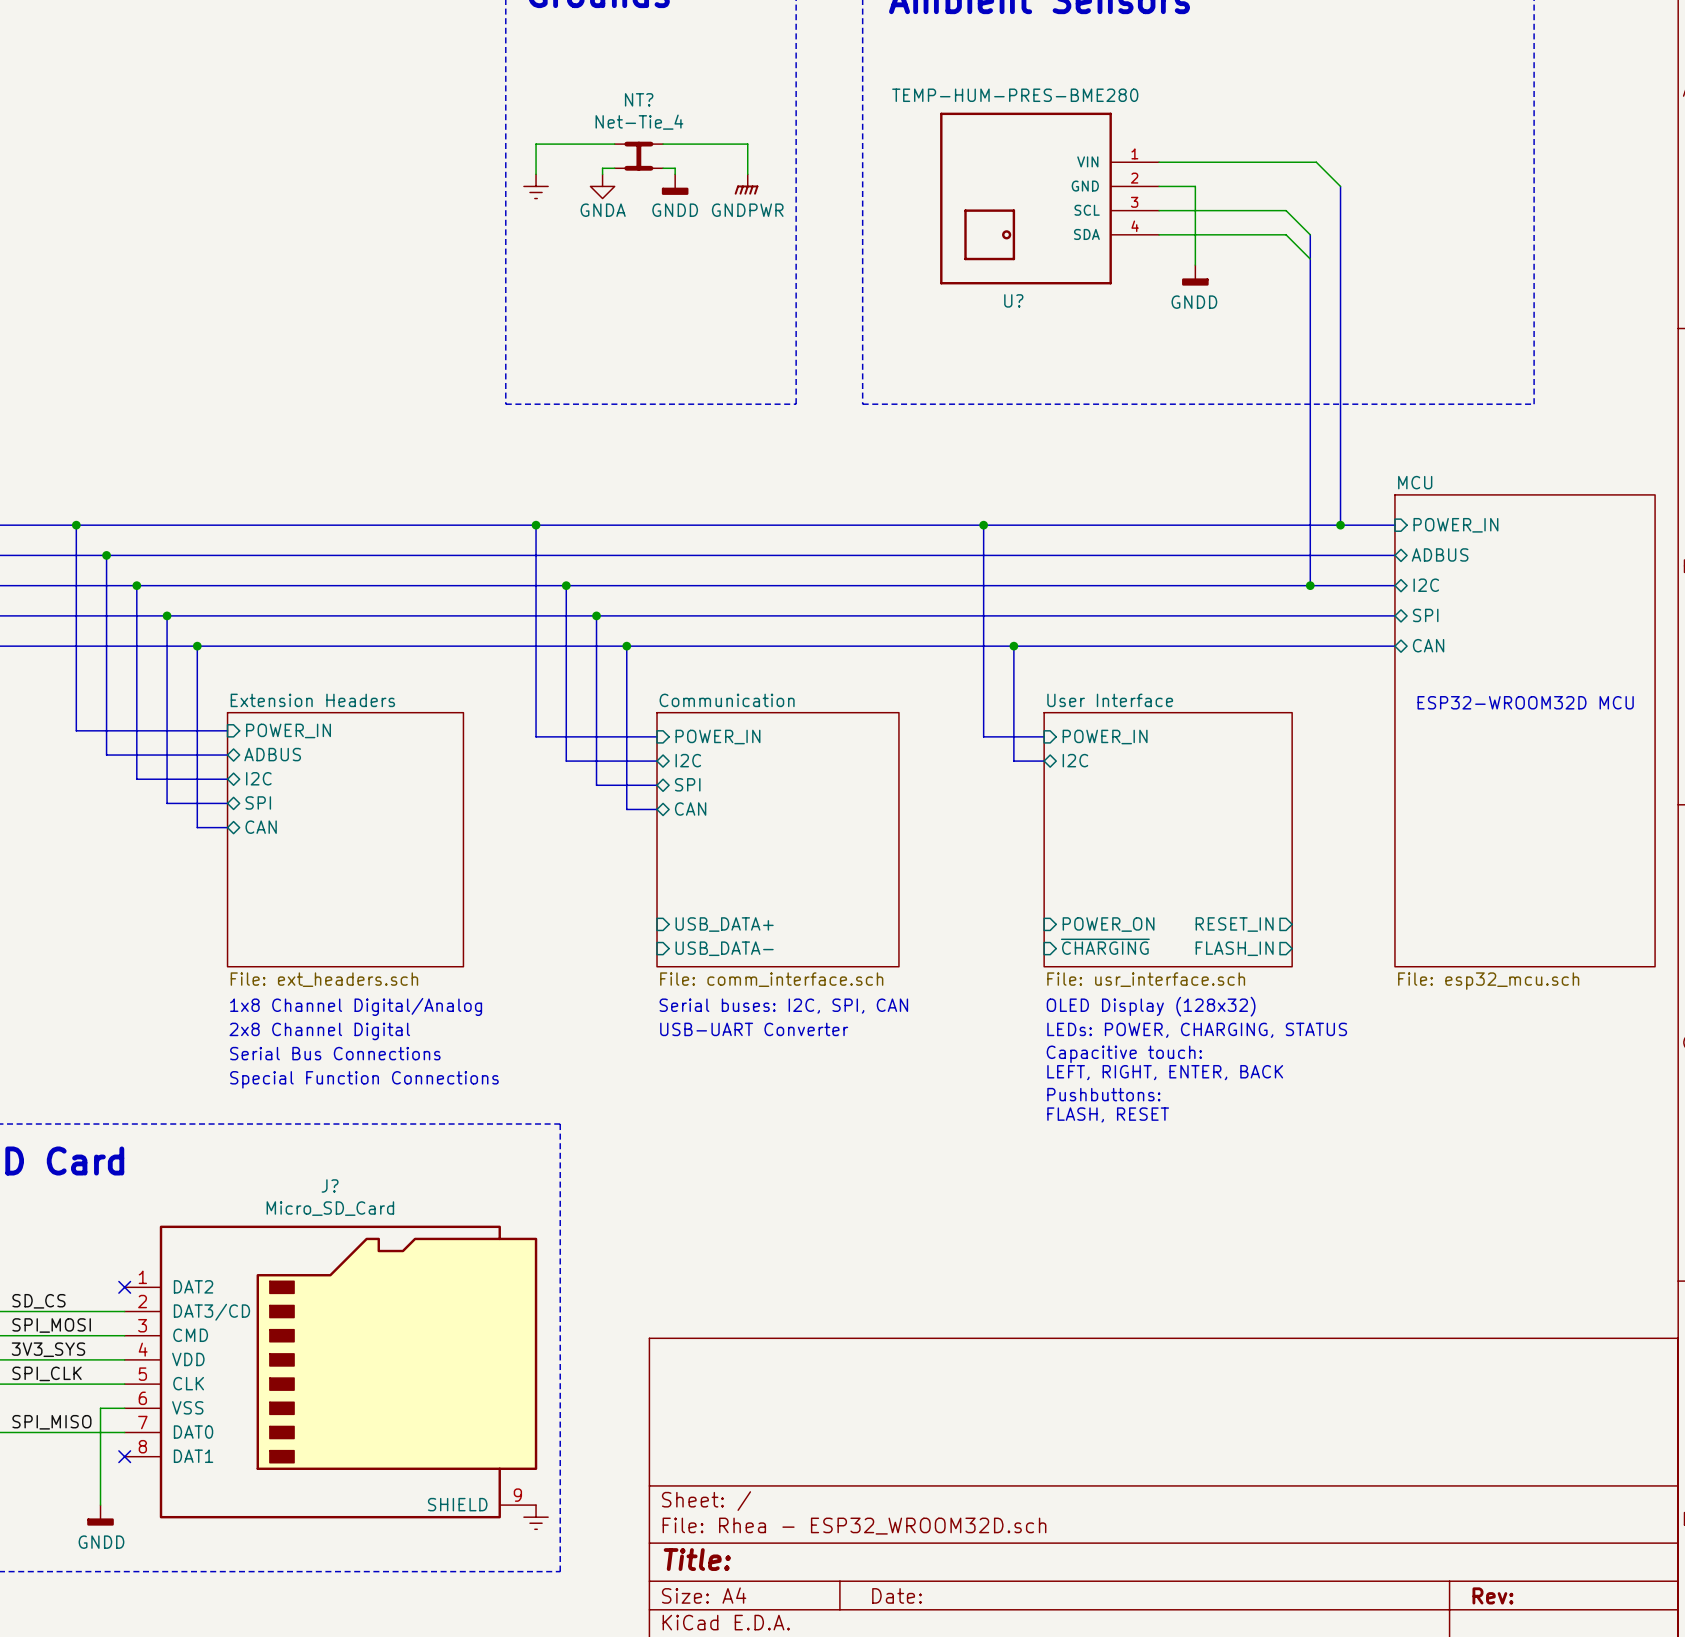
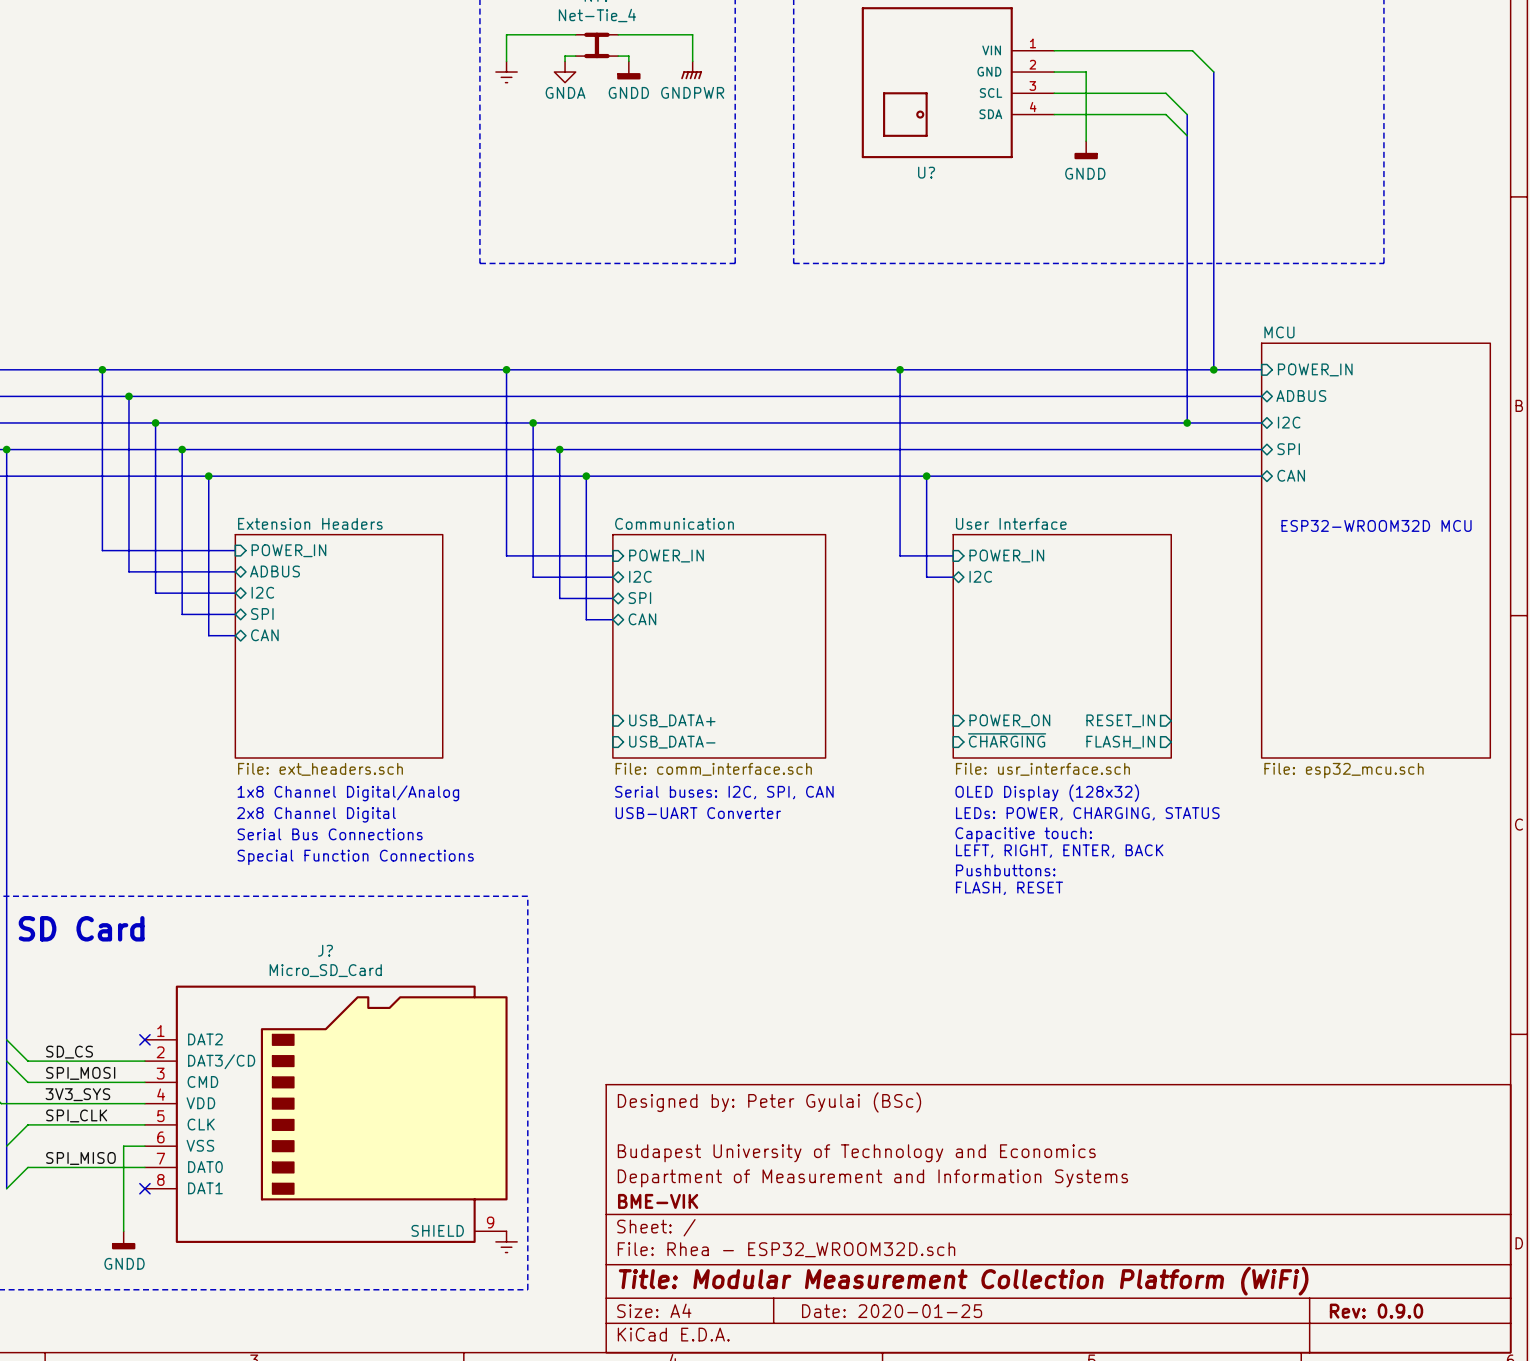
title block: none -> Designed by: Peter Gyulai (BSc) (769, 1102)
title block: none -> Budapest University of Technology and Economics (856, 1153)
title block: none -> Department of Measurement and Information Systems (872, 1178)
title block: none -> BME-VIK (658, 1201)
title block: Title: (697, 1559) -> Title: Modular Measurement Collection Platform (WiFi) (963, 1281)
title block: Date: (897, 1595) -> Date: 2020-01-25 (892, 1311)
title block: Rev: (1492, 1595) -> Rev: 0.9.0 (1376, 1311)

